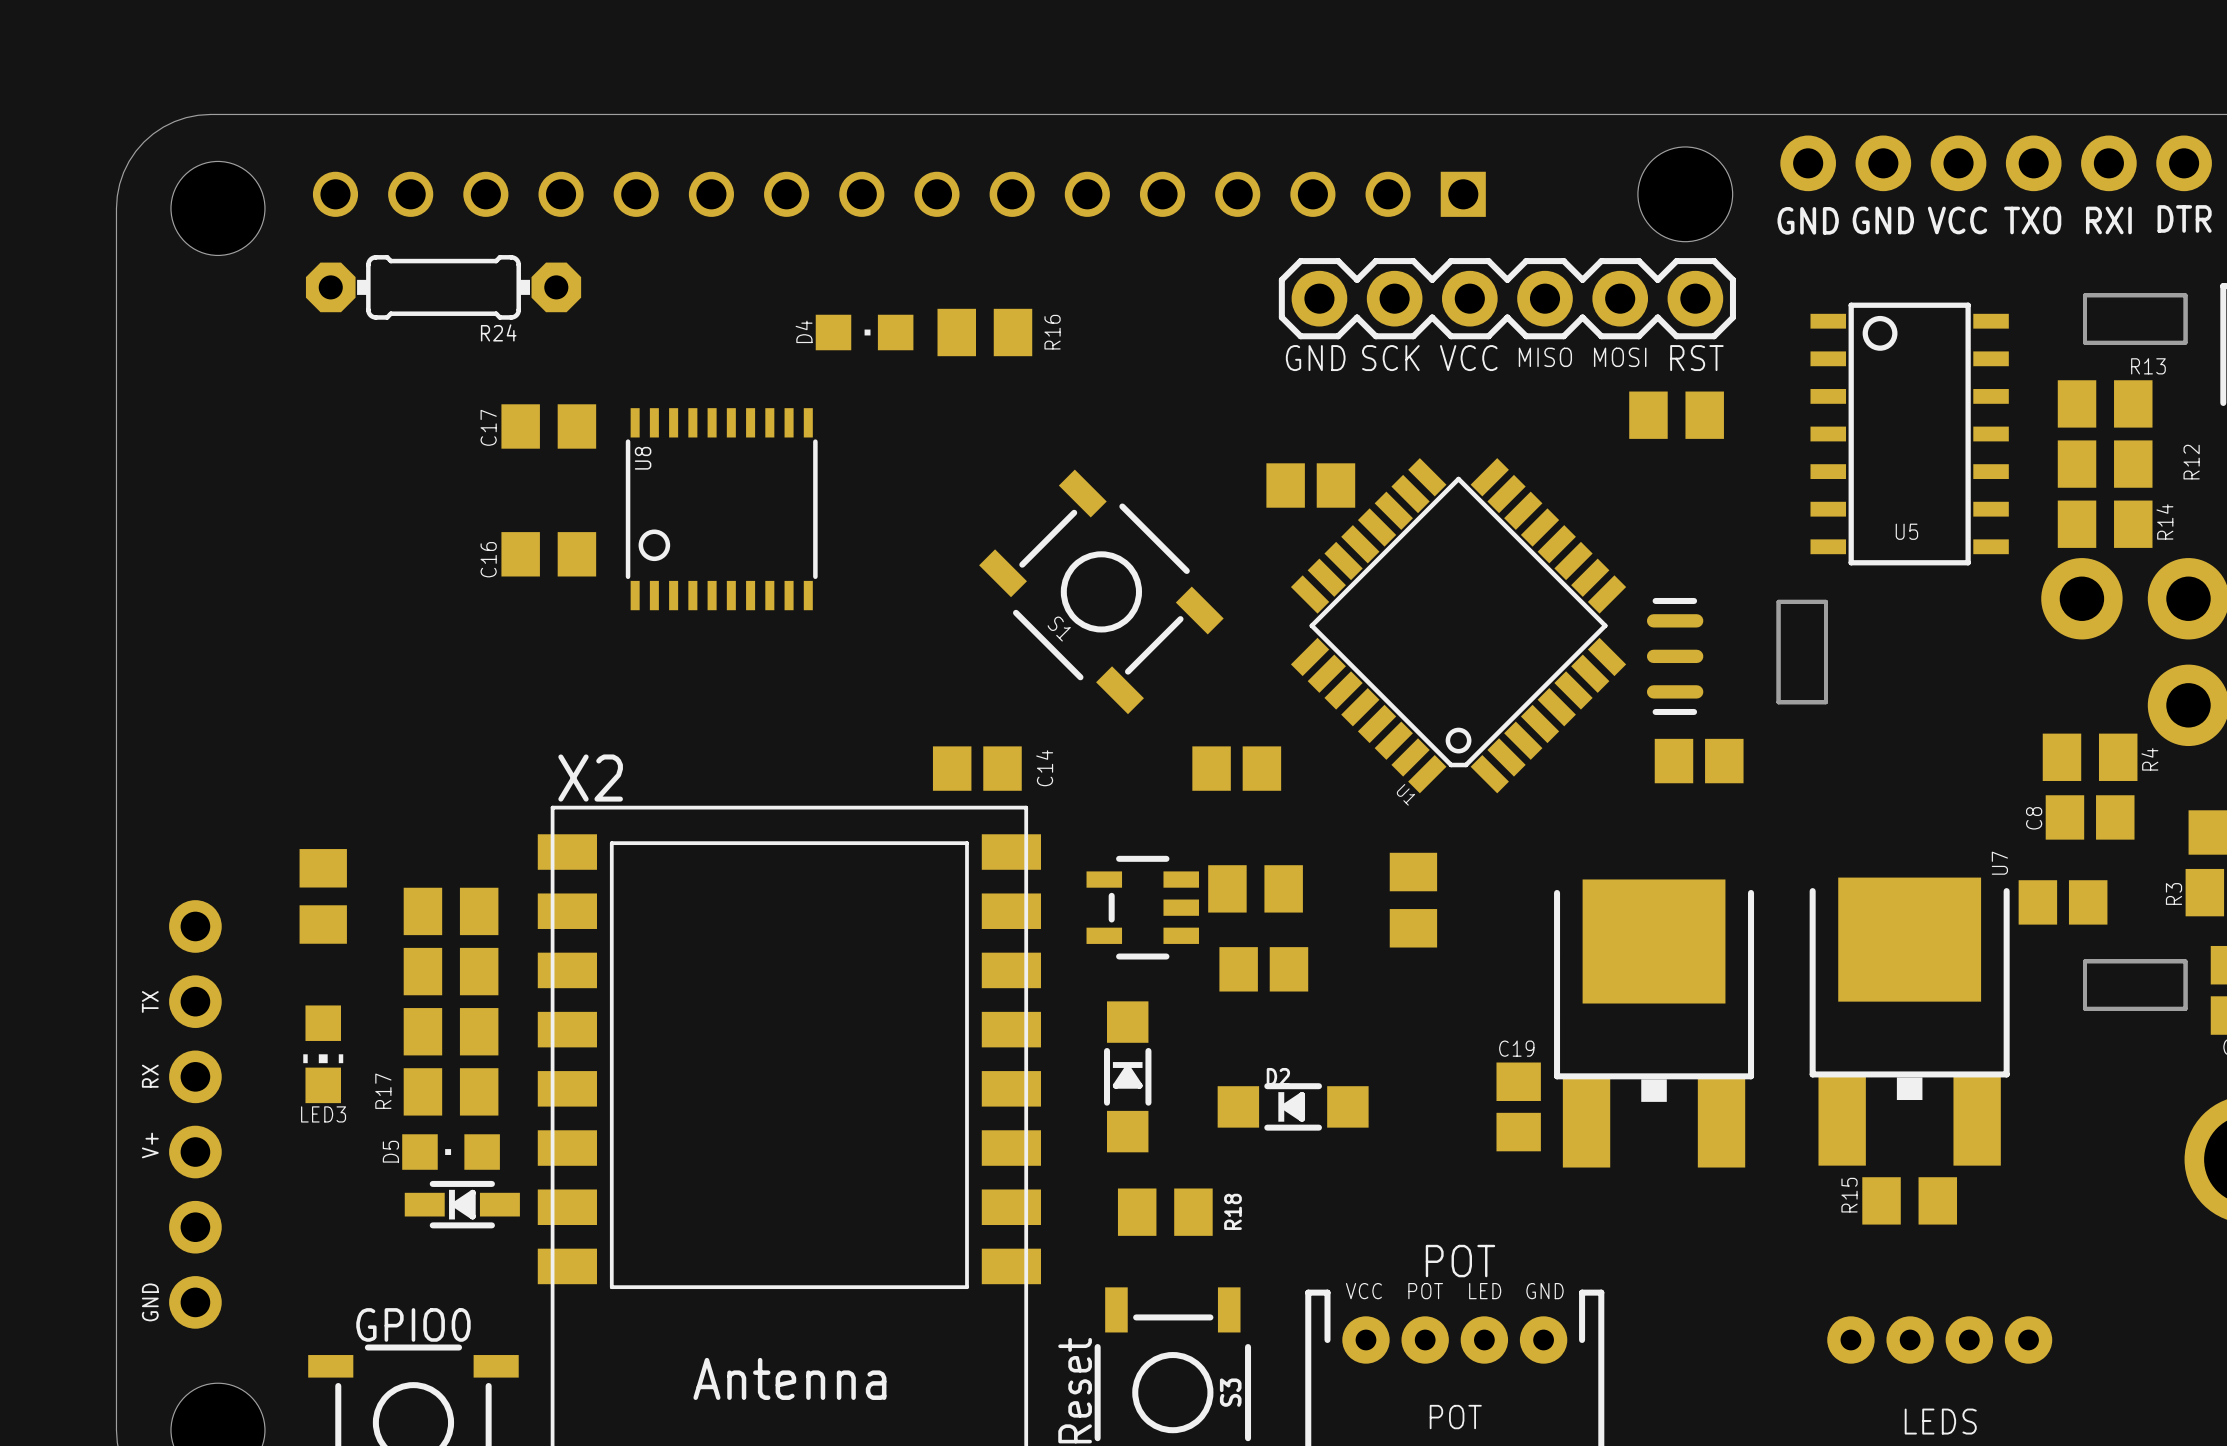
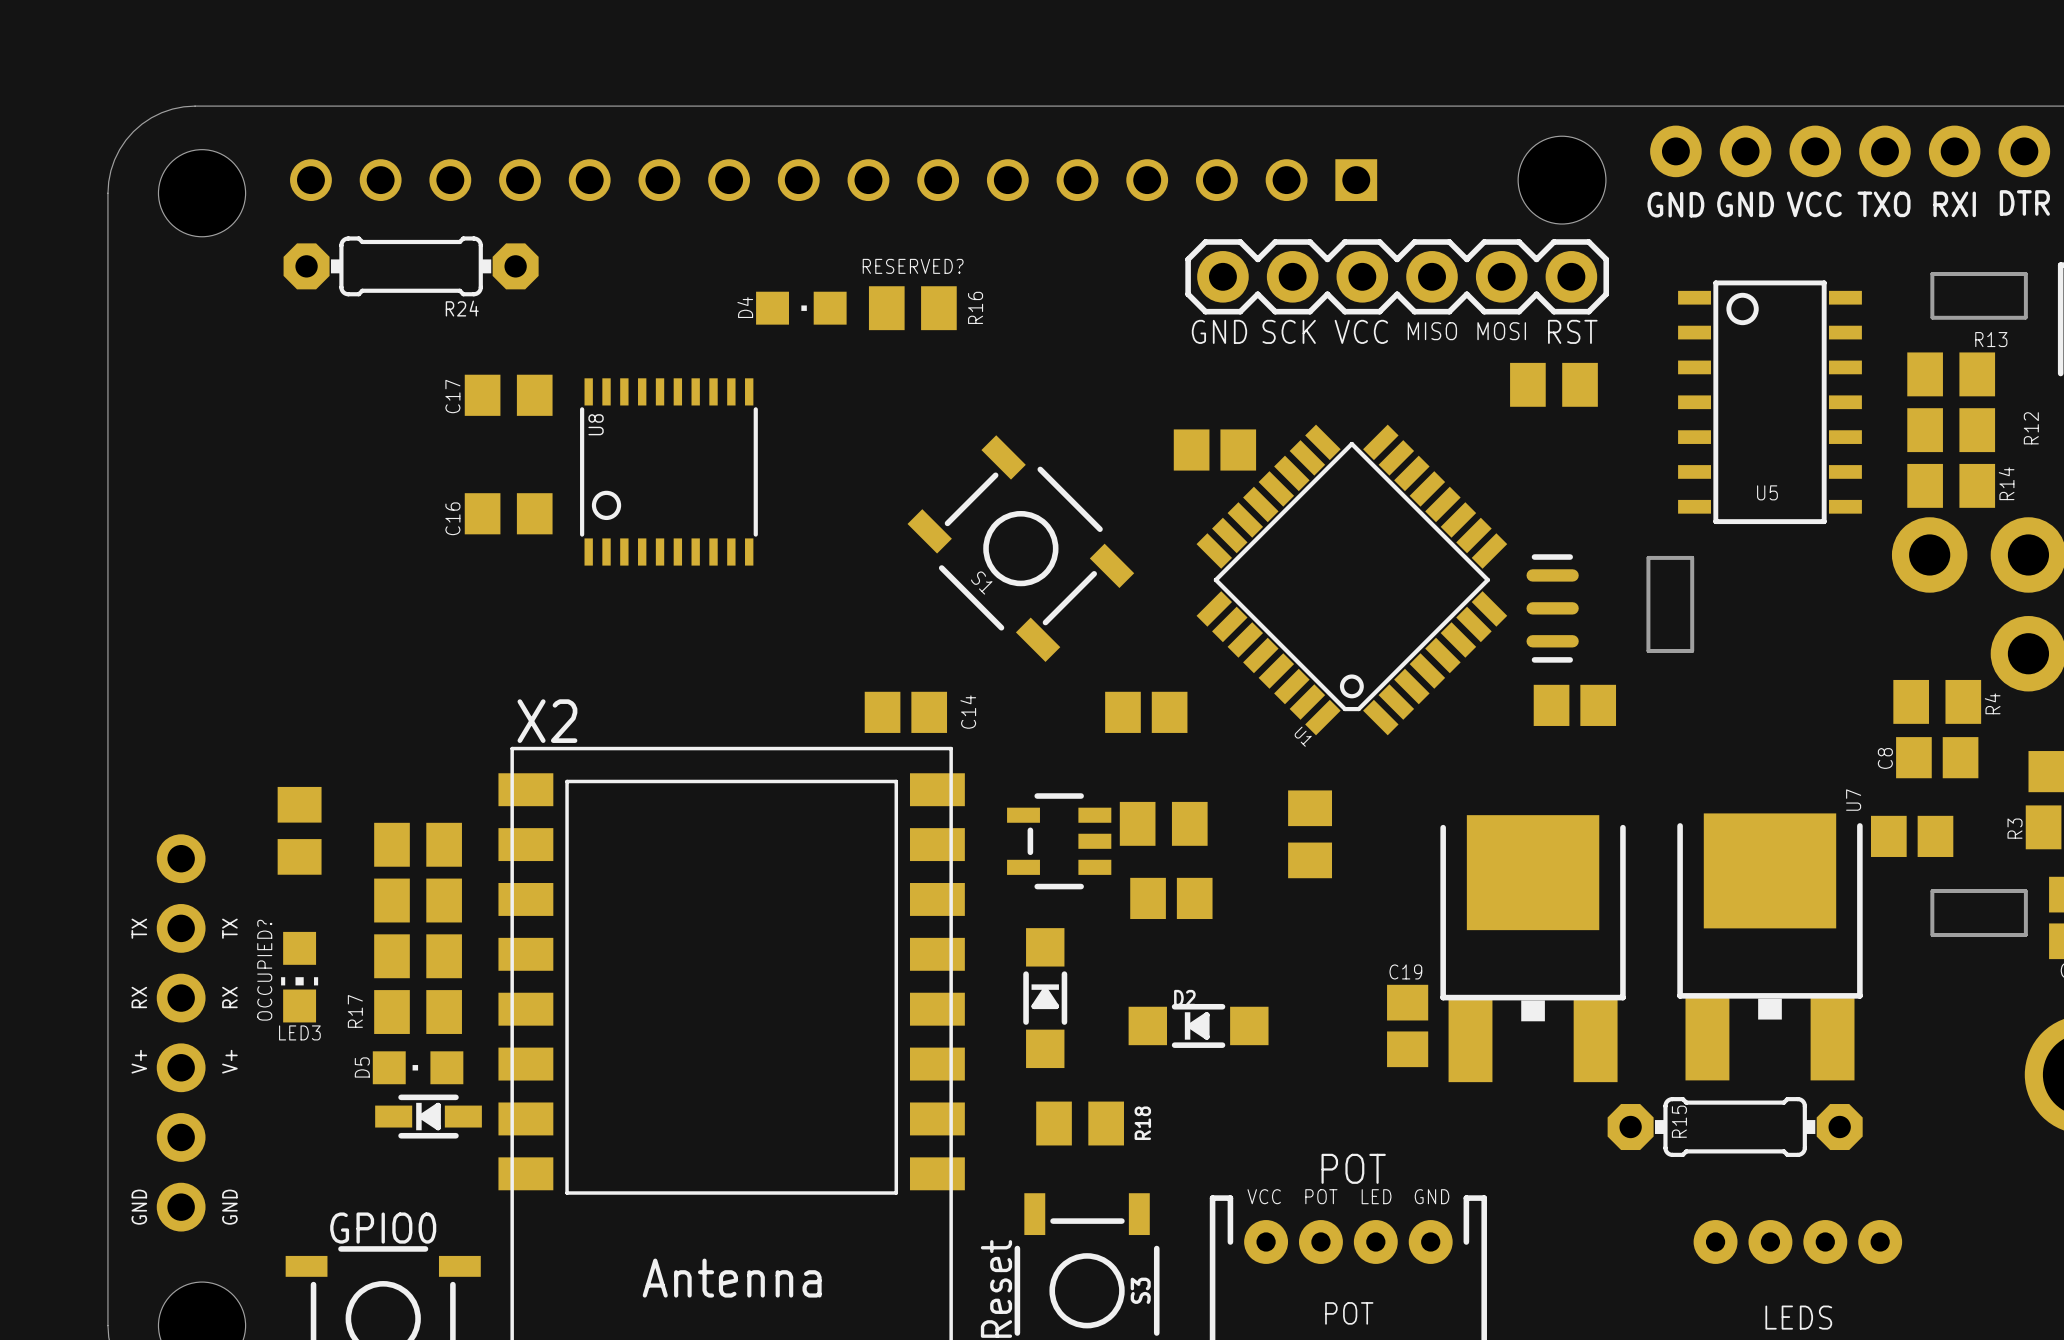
text: none -> RESERVED? (913, 266)
text: none -> TX (229, 928)
text: none -> OCCUPIED? (264, 970)
text: none -> RX (229, 997)
text: none -> V+ (229, 1061)
R15 footprint: [1862, 1177, 1958, 1225] -> [1607, 1097, 1863, 1157]
text: none -> GND (229, 1207)

